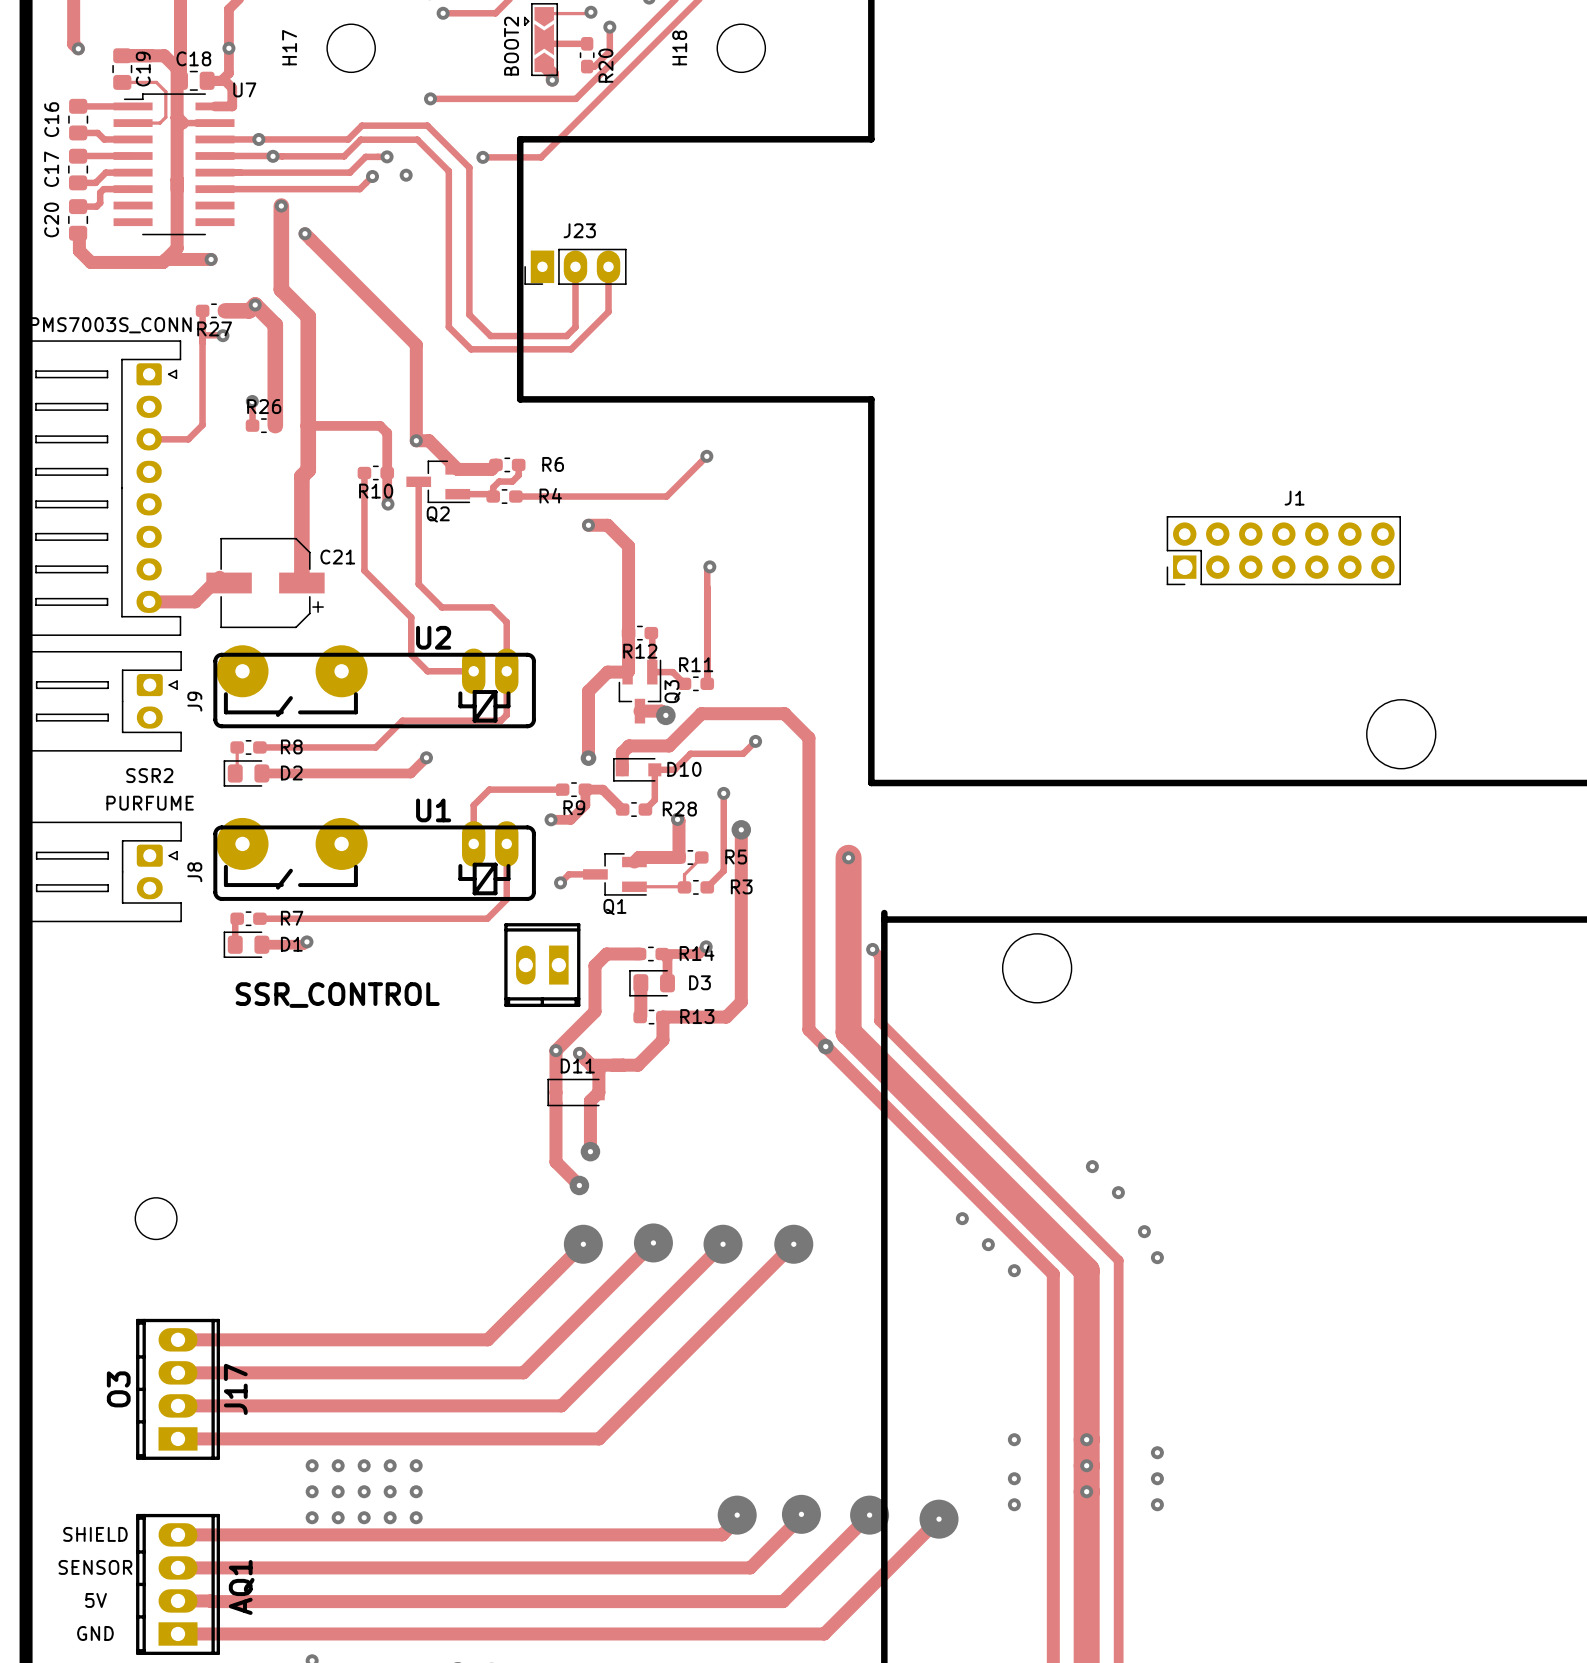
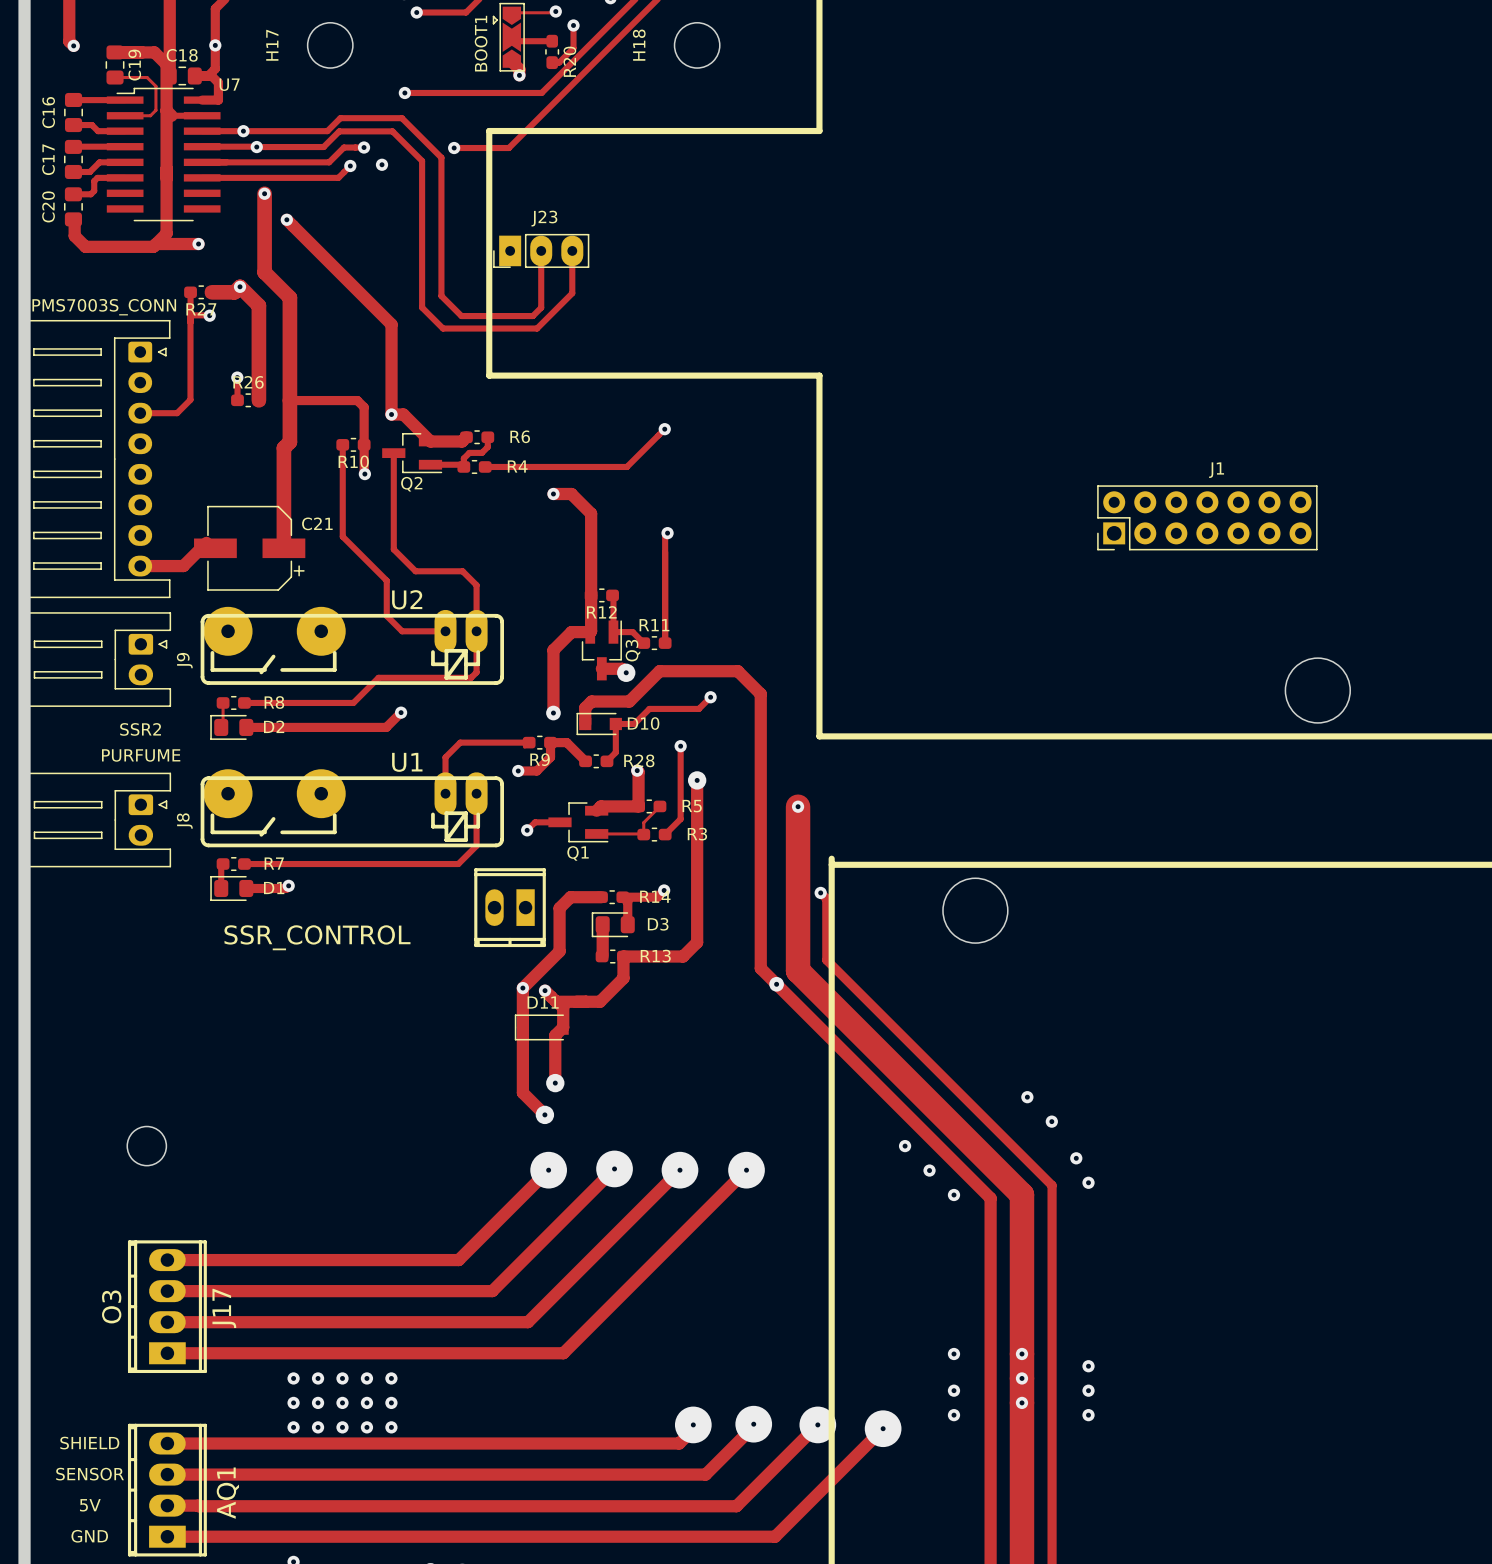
BOOT2 name: BOOT2 (511, 46) -> BOOT1 (481, 43)

